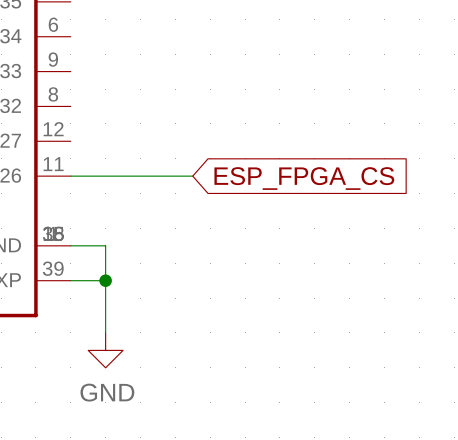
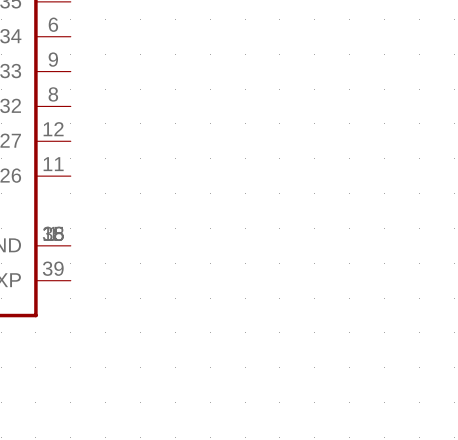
wire: (70, 176) (192, 176) -> none
global label: ESP_FPGA_CS (304, 178) -> none
wire: (70, 245) (105, 245) (105, 332) -> none
wire: (70, 280) (105, 280) -> none
junction: (105, 280) -> none
power symbol: GND (105, 350) -> none

